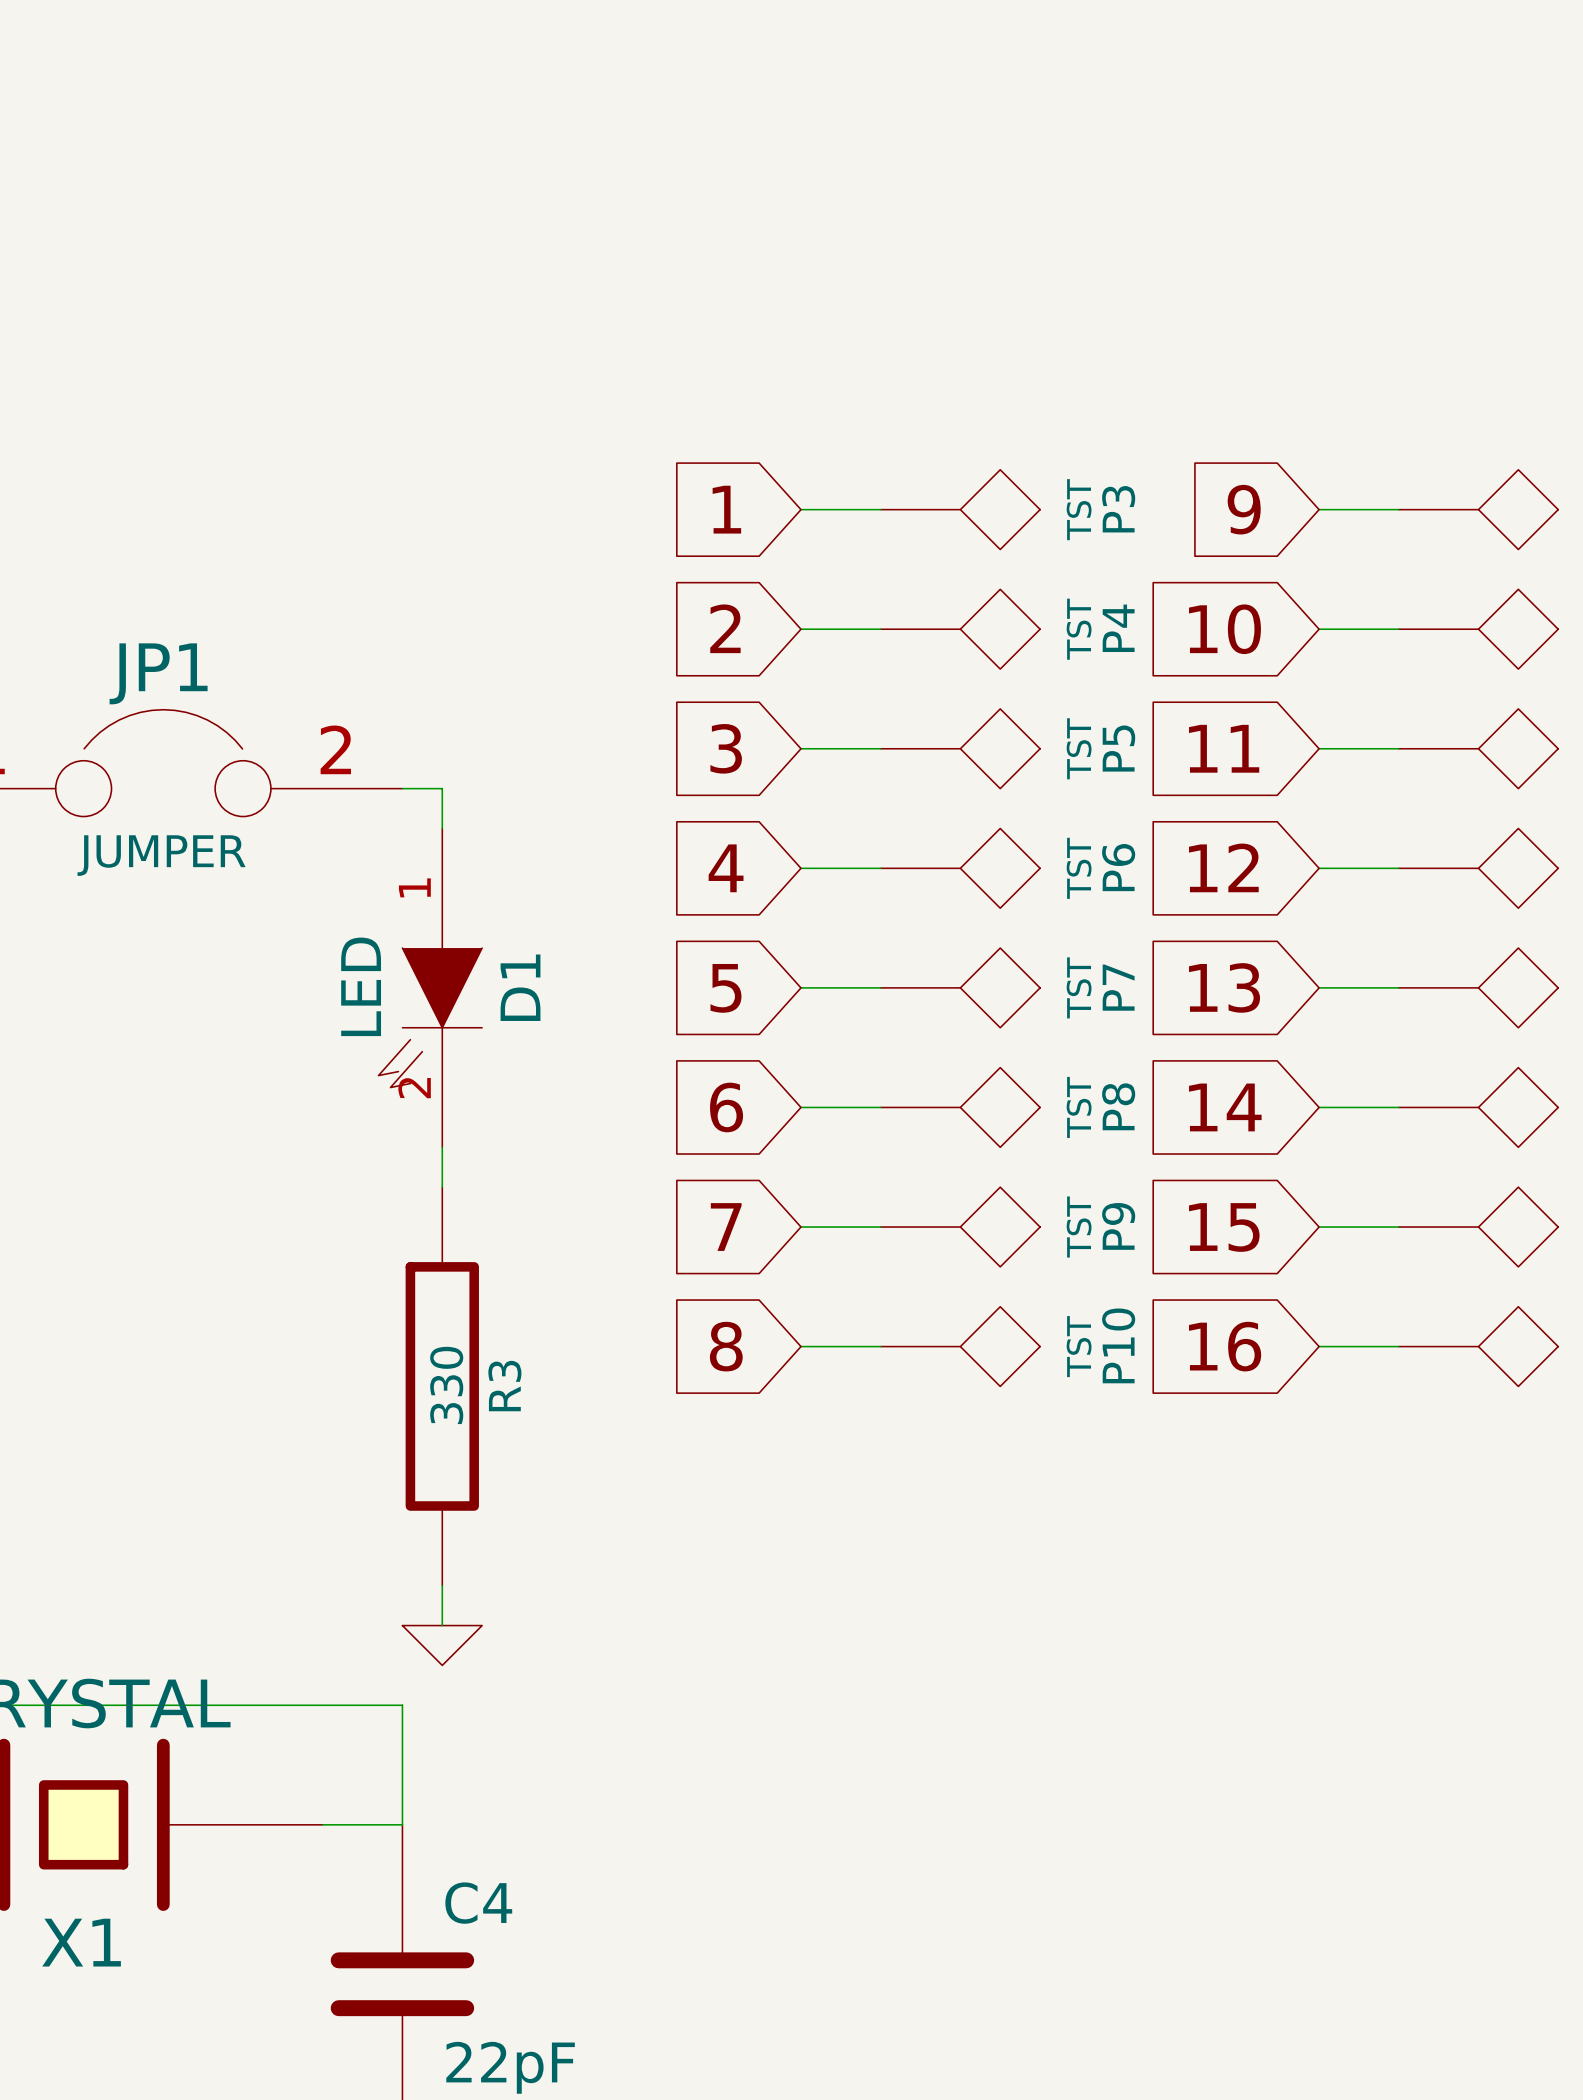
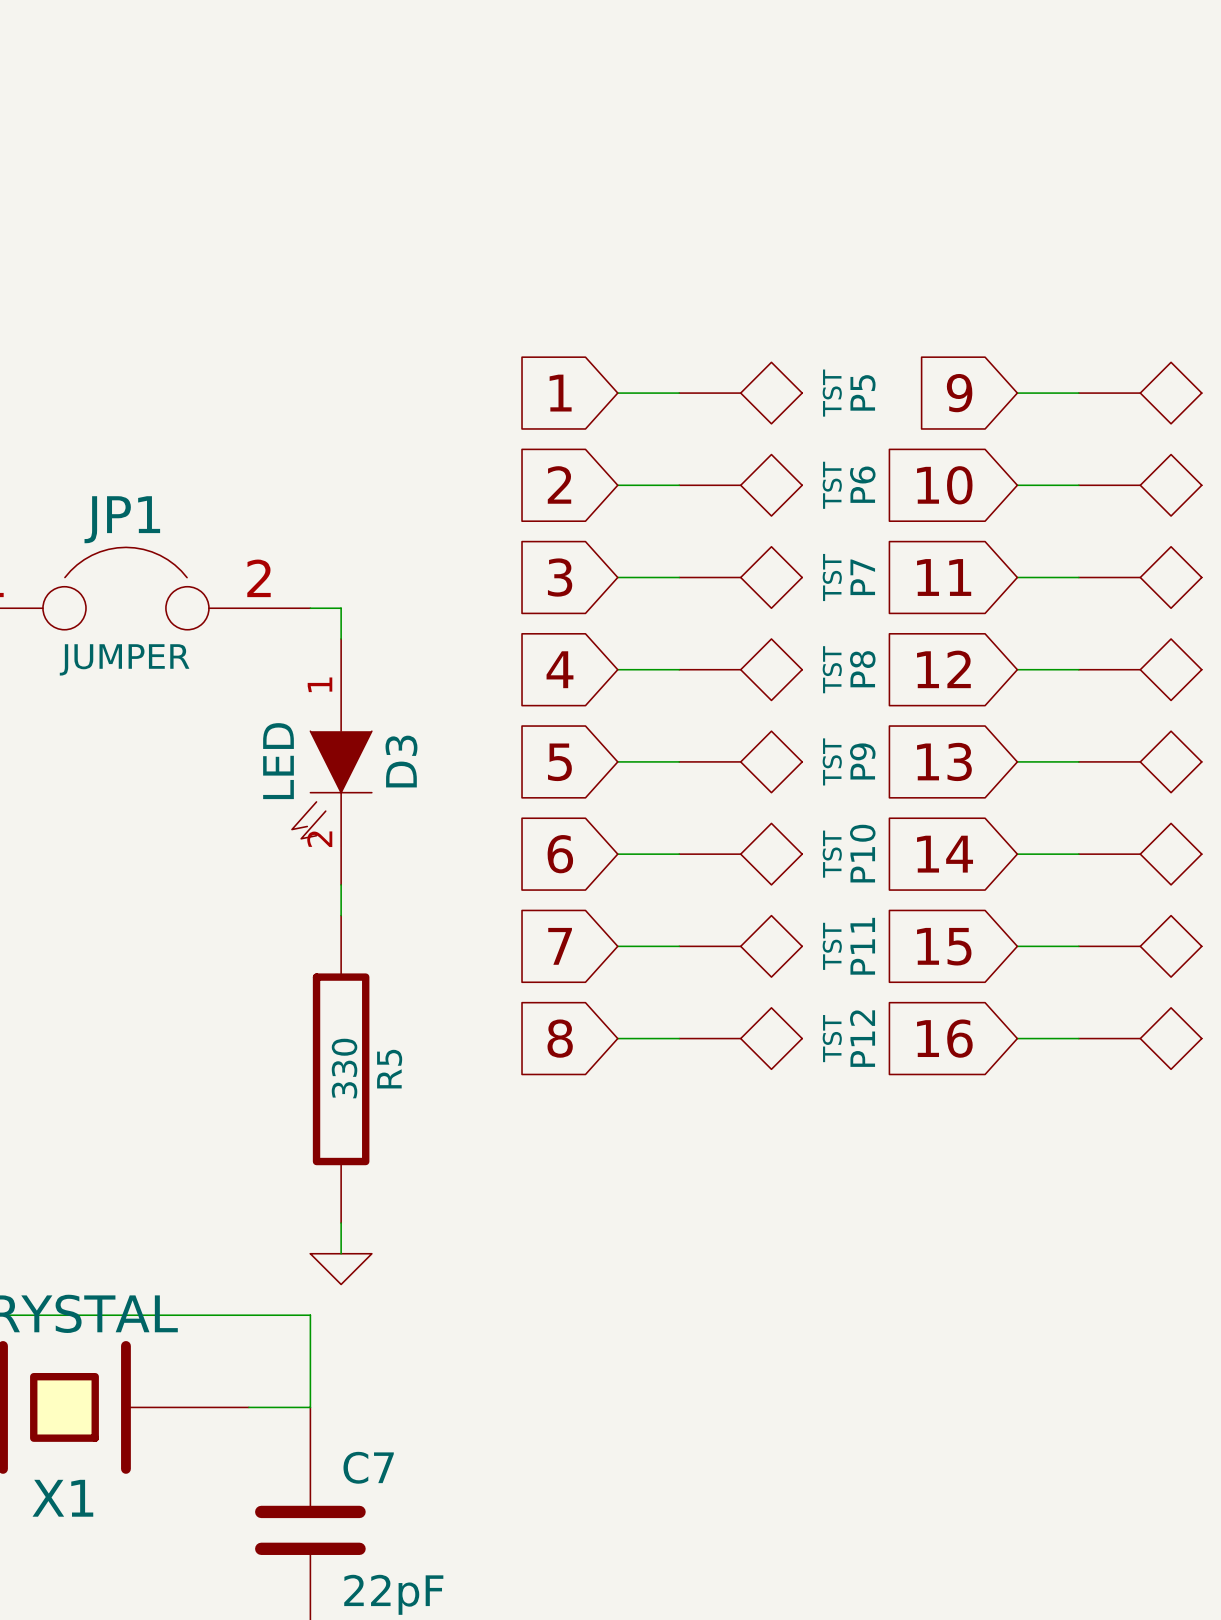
P3 name: P3 (1118, 509) -> P5 (862, 392)
P4 name: P4 (1118, 628) -> P6 (862, 484)
P5 name: P5 (1118, 748) -> P7 (862, 577)
P6 name: P6 (1118, 867) -> P8 (862, 669)
D1 name: D1 (520, 987) -> D3 (401, 761)
P7 name: P7 (1118, 987) -> P9 (862, 761)
P8 name: P8 (1118, 1106) -> P10 (862, 853)
P9 name: P9 (1118, 1226) -> P11 (862, 946)
P10 name: P10 (1118, 1345) -> P12 (862, 1038)
R3 name: R3 (504, 1386) -> R5 (389, 1069)
C4 name: C4 (478, 1903) -> C7 (368, 1467)

